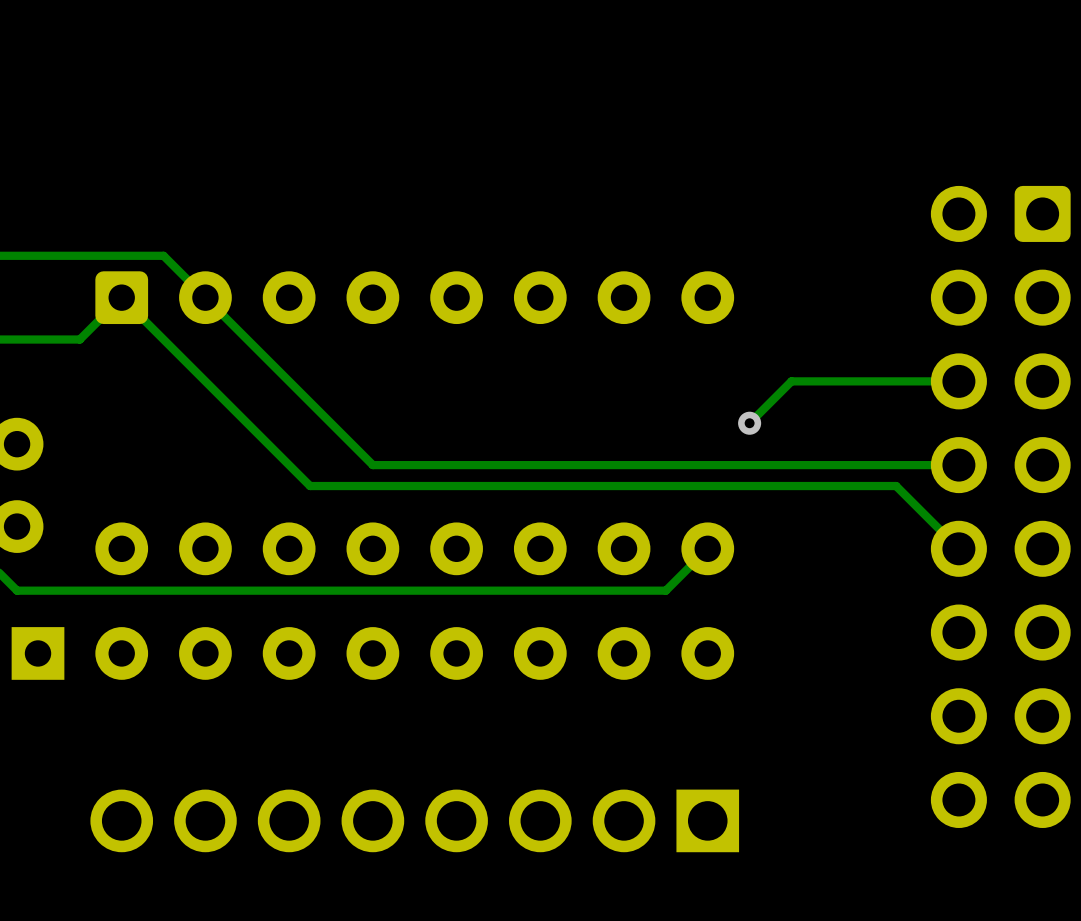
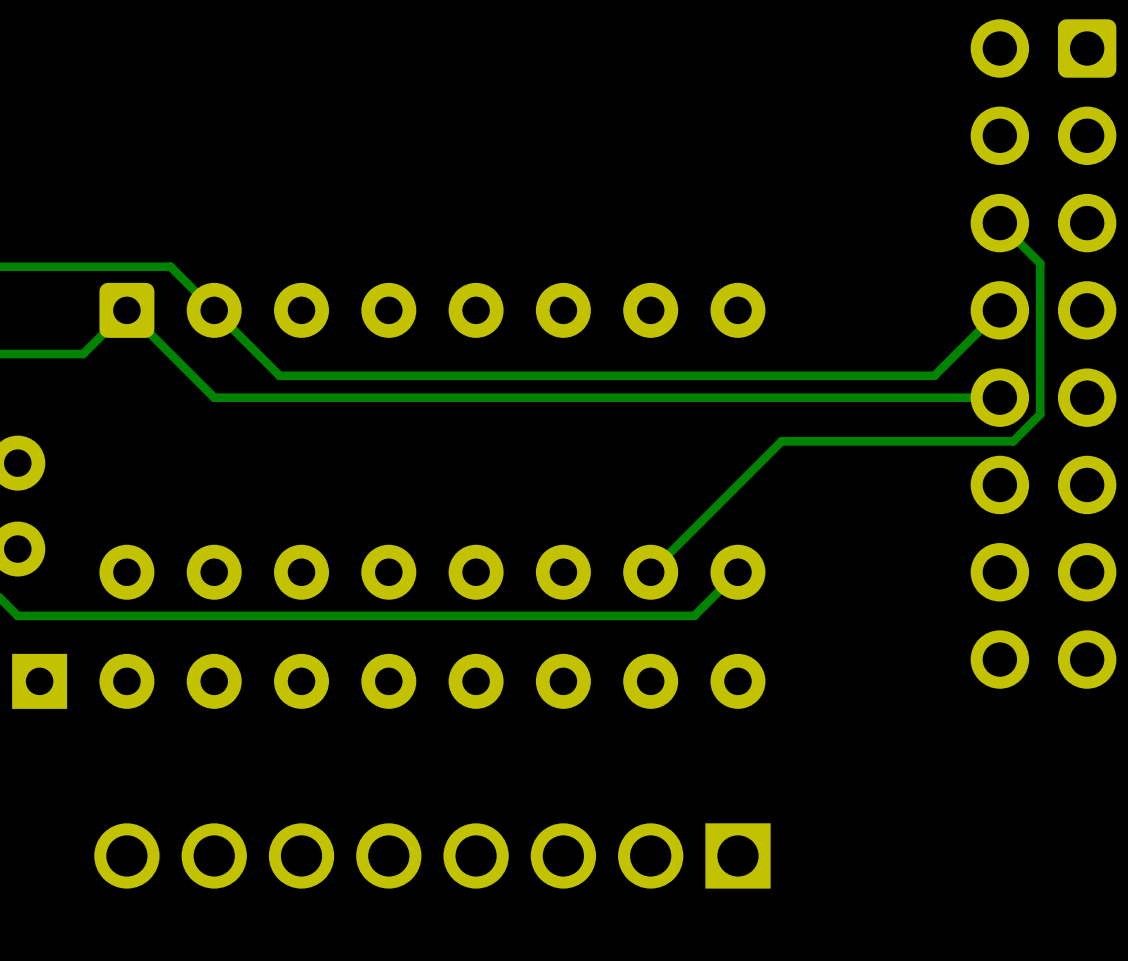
track: none -> (999, 223) (1040, 263) (1040, 414) (1013, 441) (781, 441) (650, 572)
track: (268, 360) (372, 465) (958, 465) -> (279, 375) (934, 375) (999, 310)
track: (205, 381) (310, 486) (896, 486) (958, 548) -> (214, 397) (825, 397)
track: (791, 381) (749, 423) -> none
via: (749, 423) -> none
part position: (1000, 506) -> (1043, 354)

